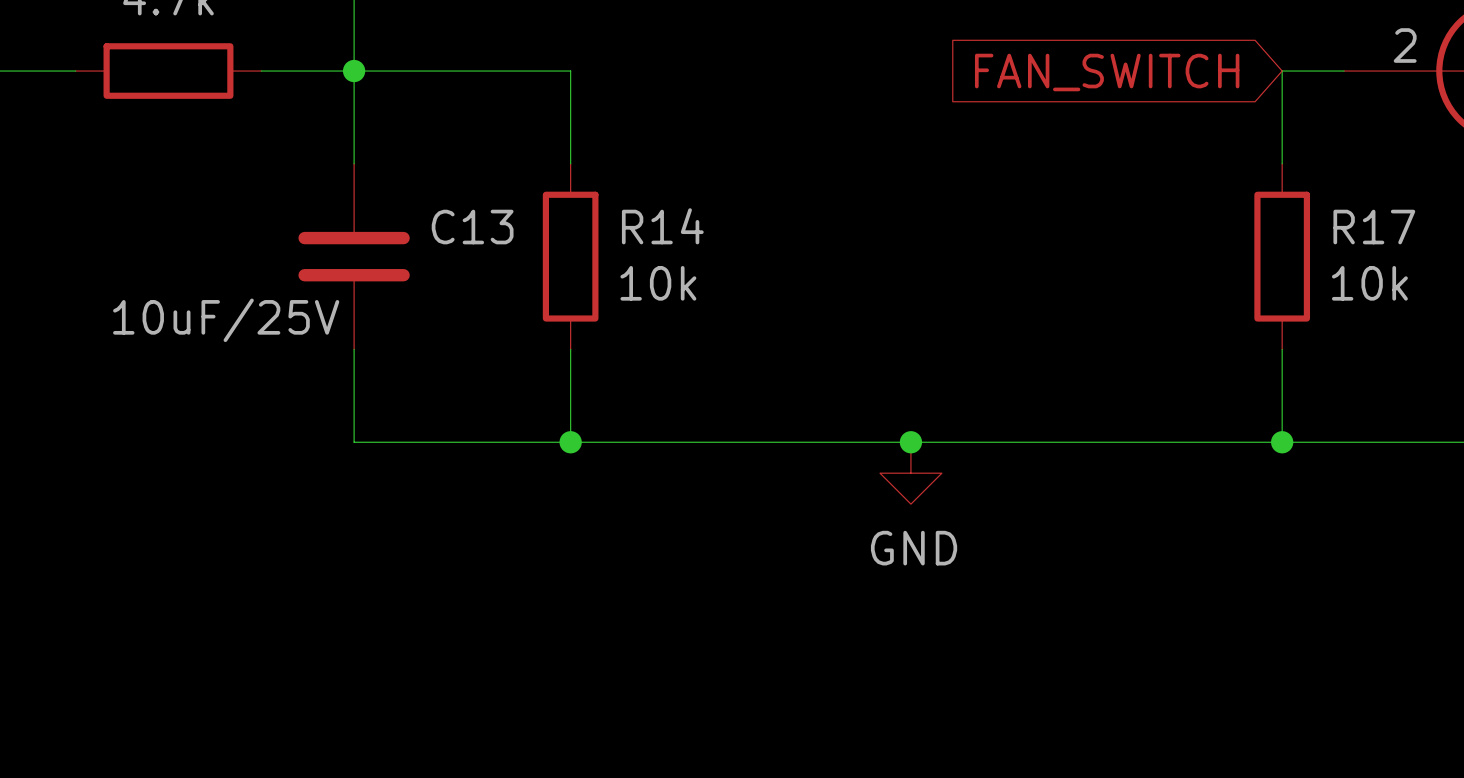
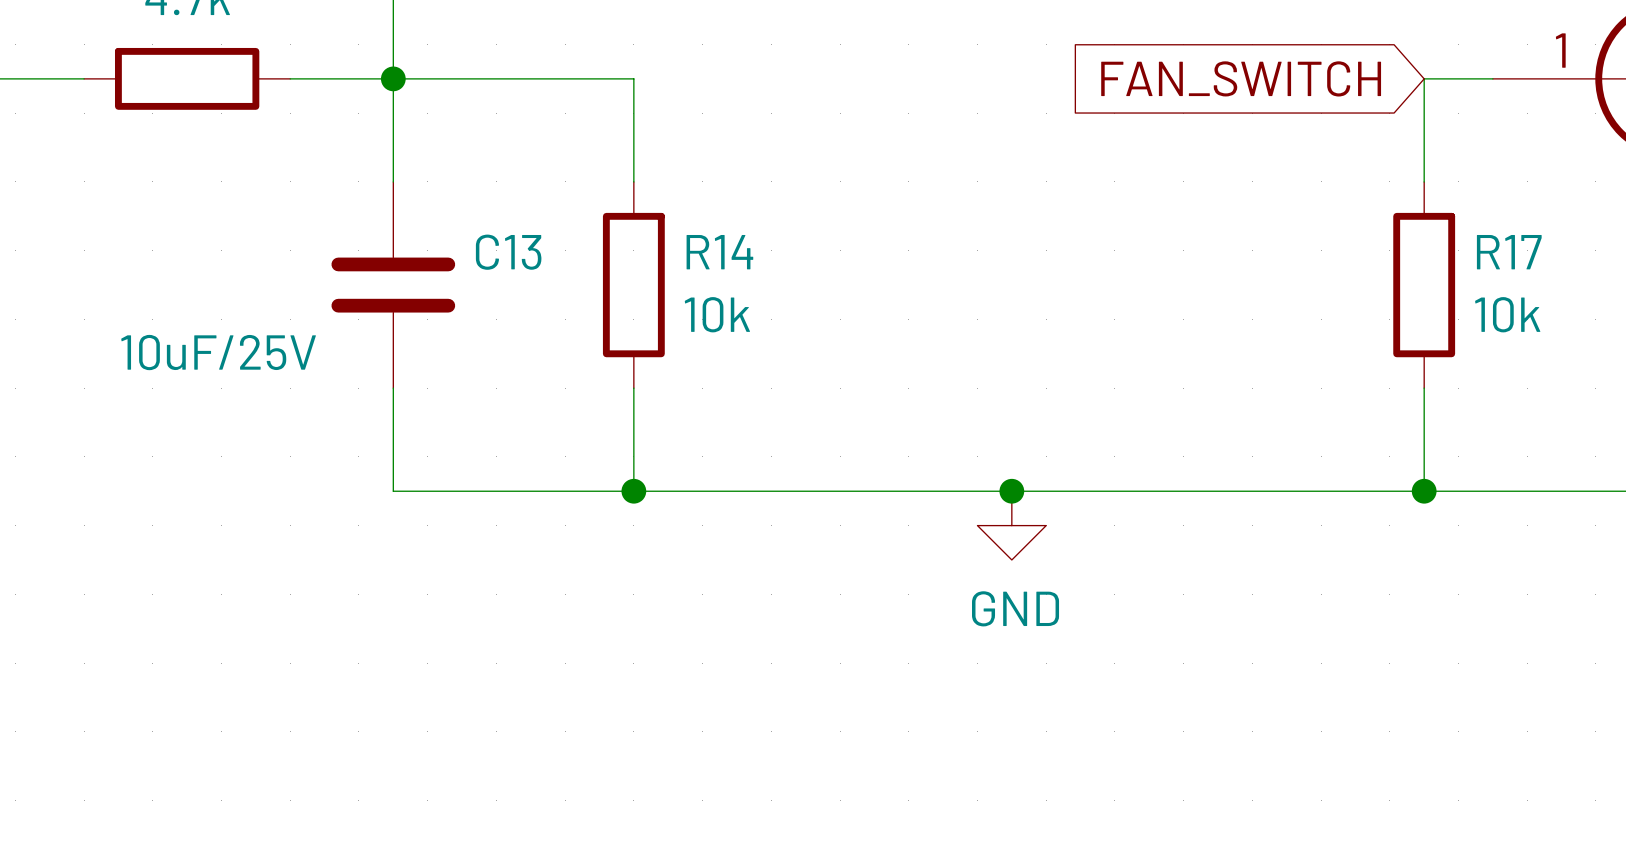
part pin number: 2 (1405, 45) -> 1 (1560, 50)

